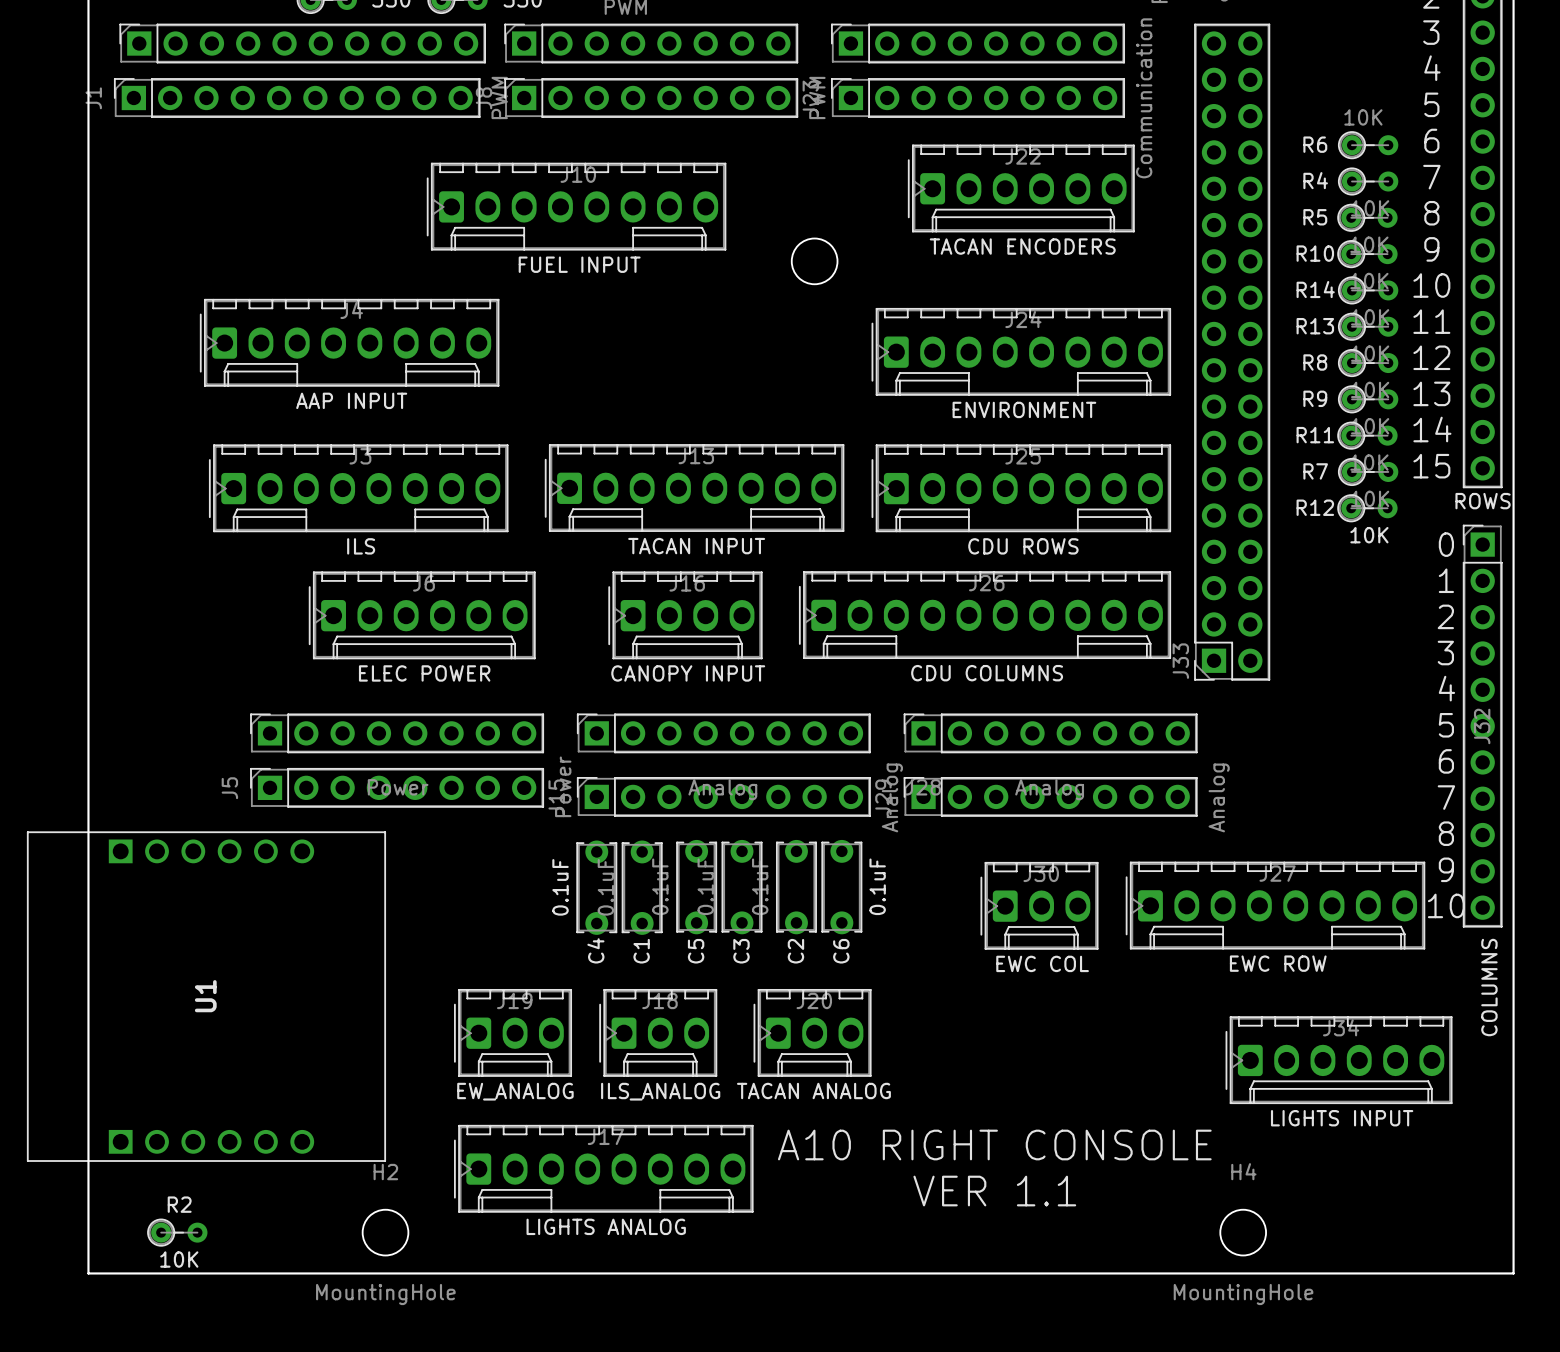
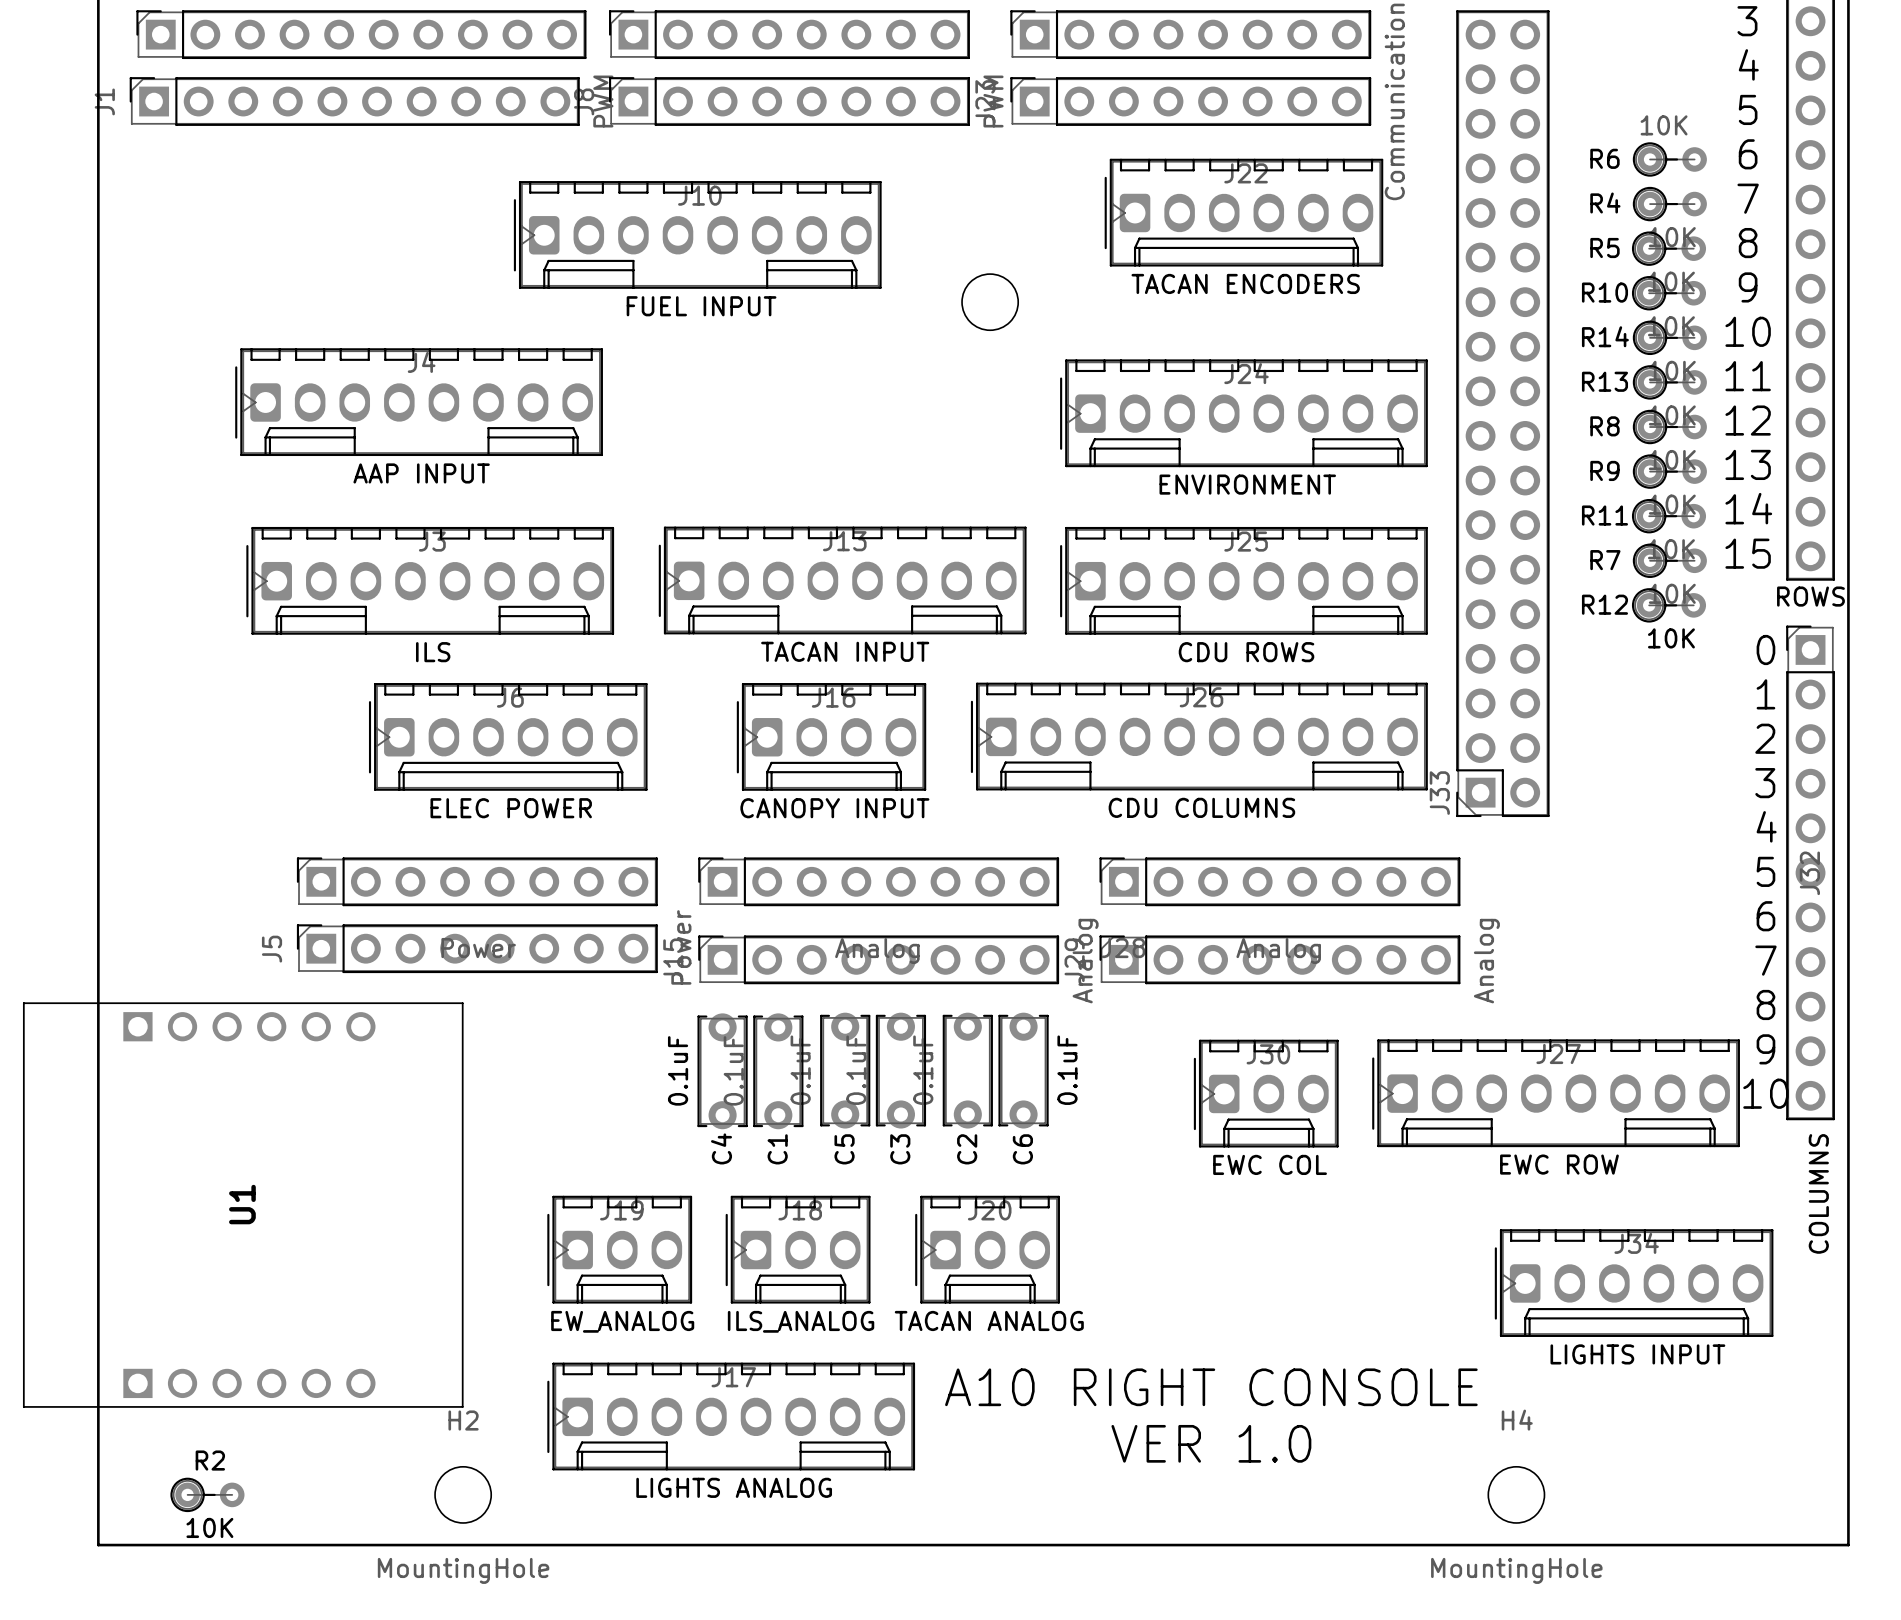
text: VER 1.1 (994, 1191) -> VER 1.0 (1211, 1443)

